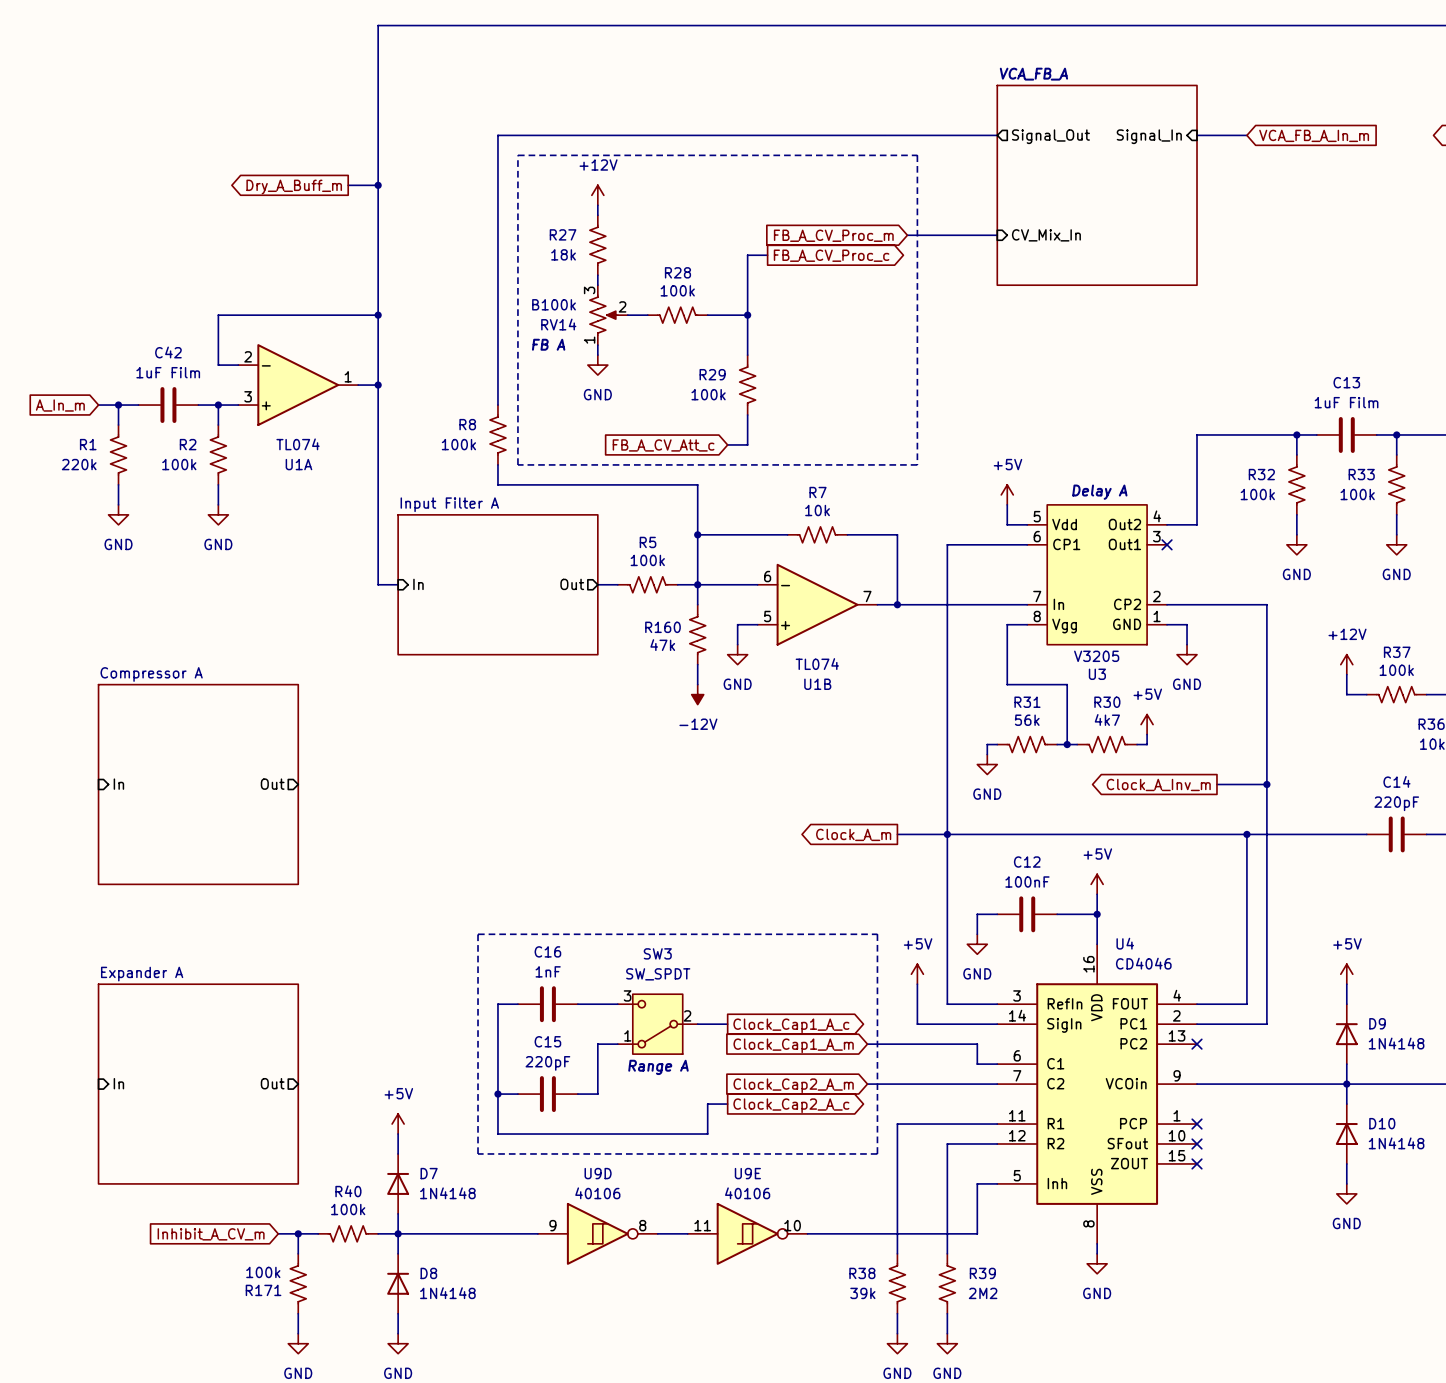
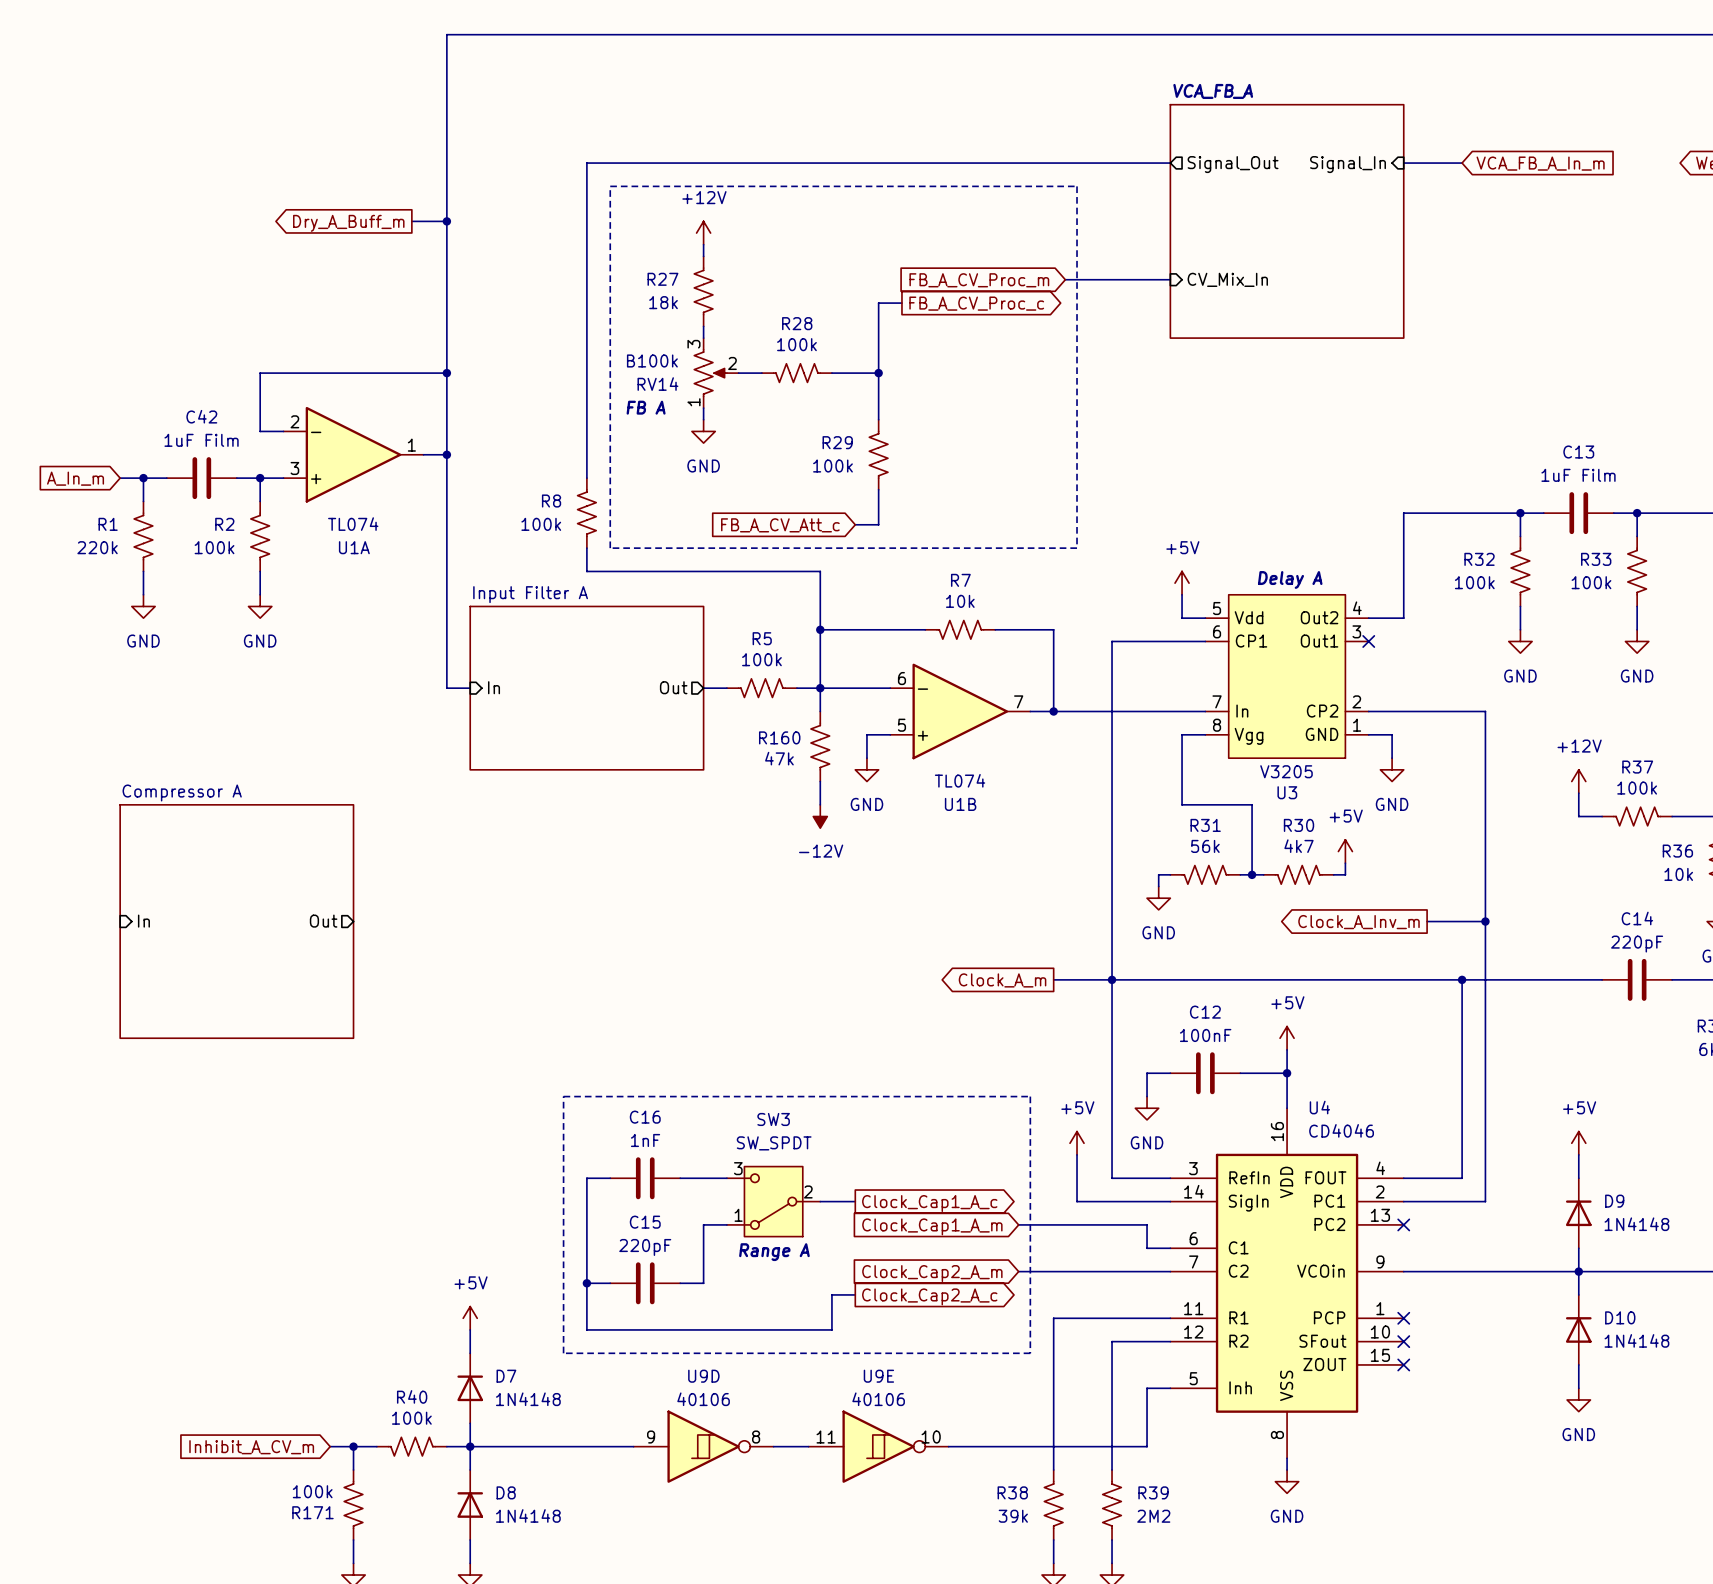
sheet pin: In (118, 1083) -> none
sheet pin: Out (272, 1083) -> none
sheet Expander A: (198, 1084) -> none

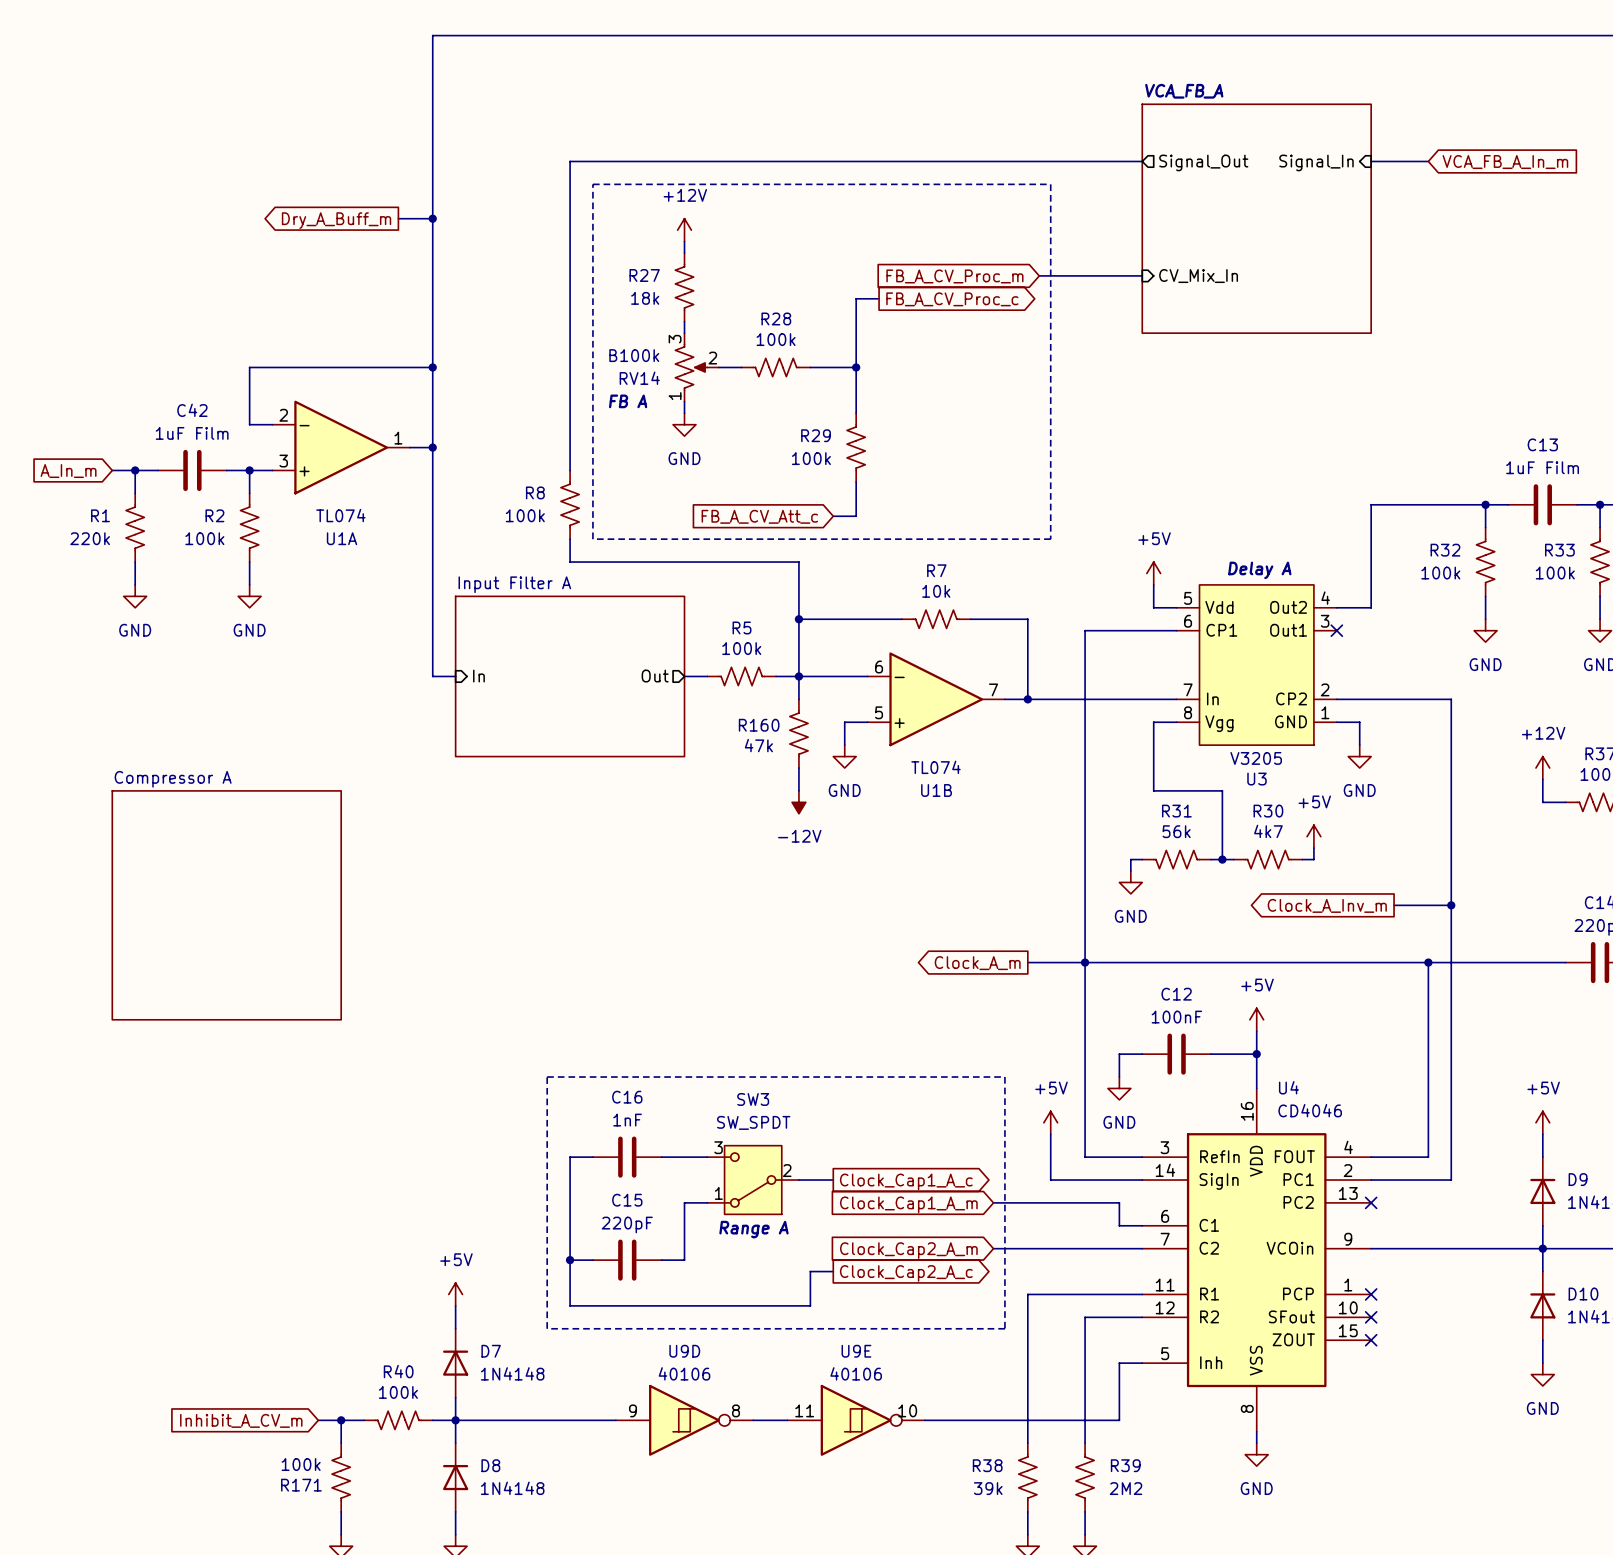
sheet pin: In (143, 921) -> none
sheet pin: Out (323, 921) -> none

